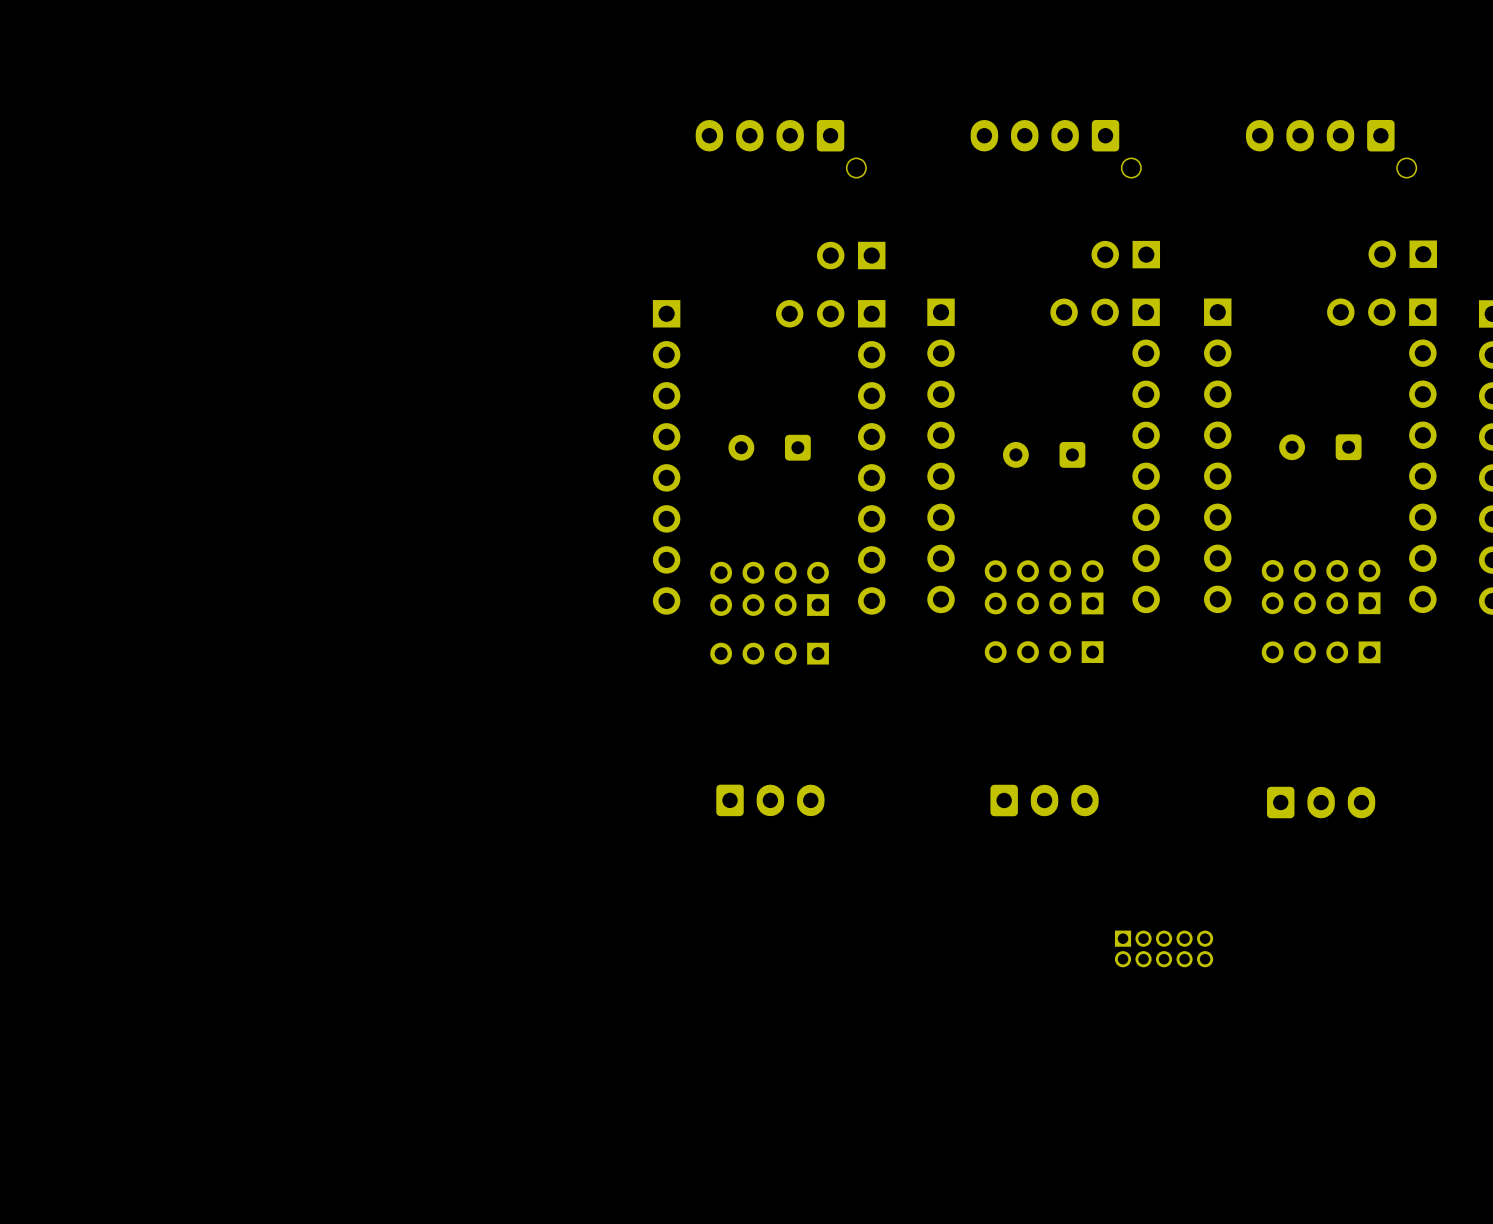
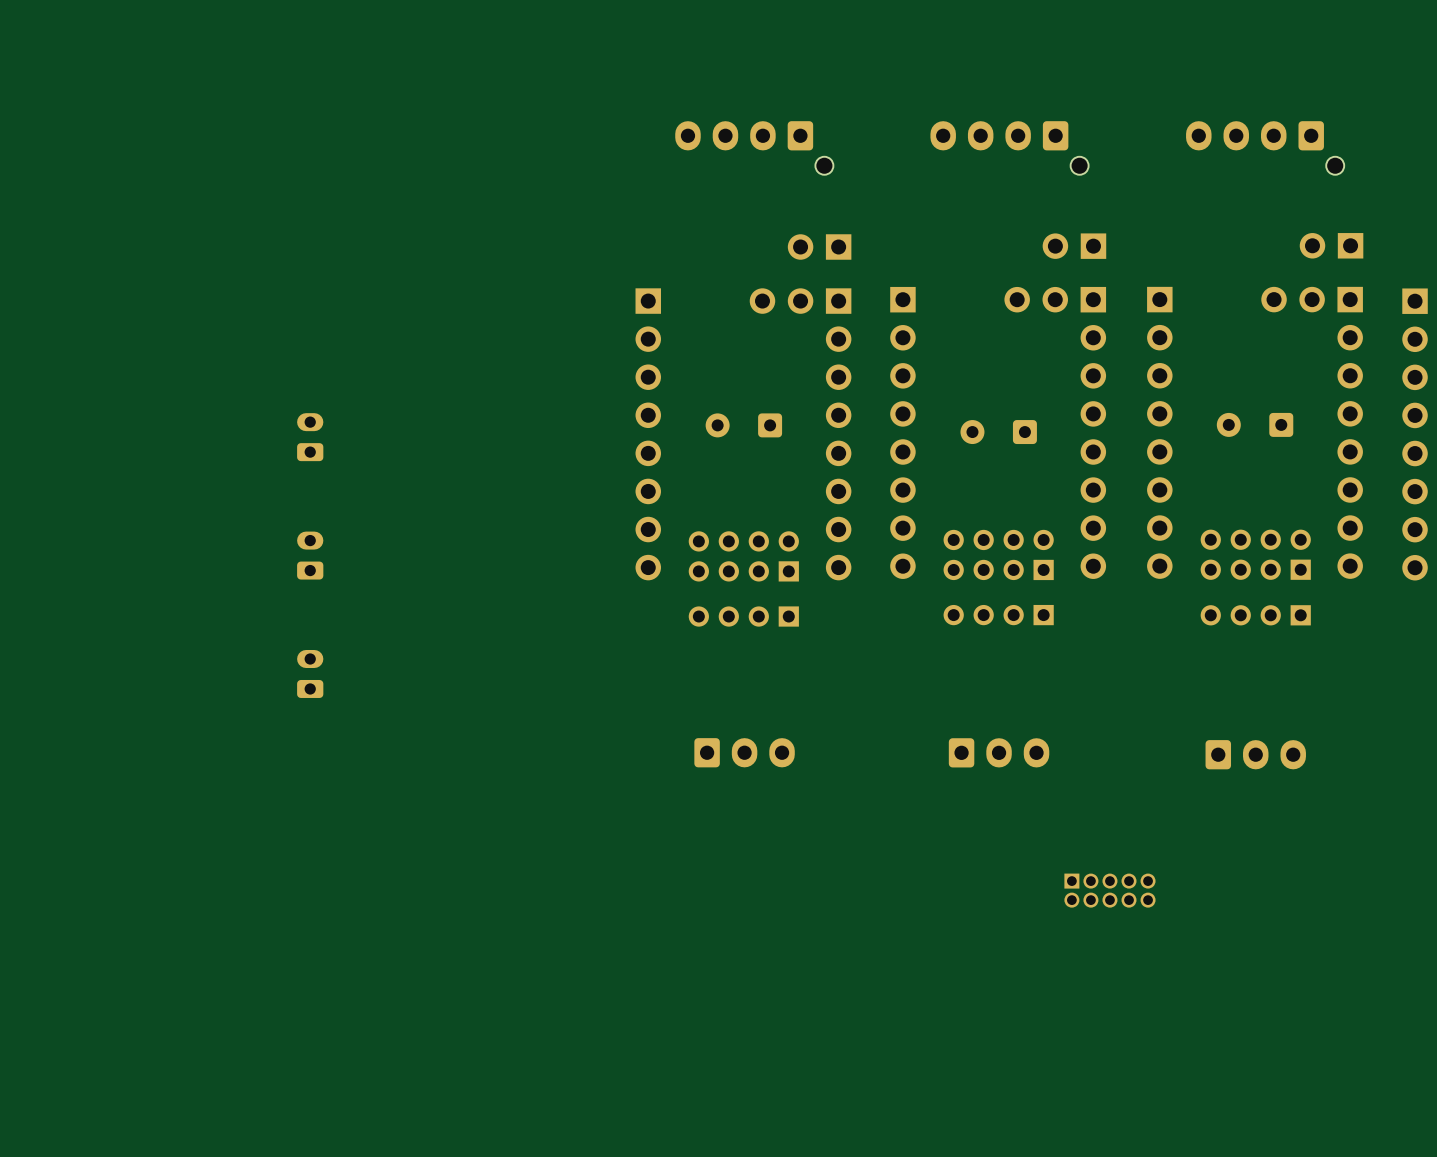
part: none -> (310, 437)
part: none -> (310, 555)
part: none -> (310, 673)

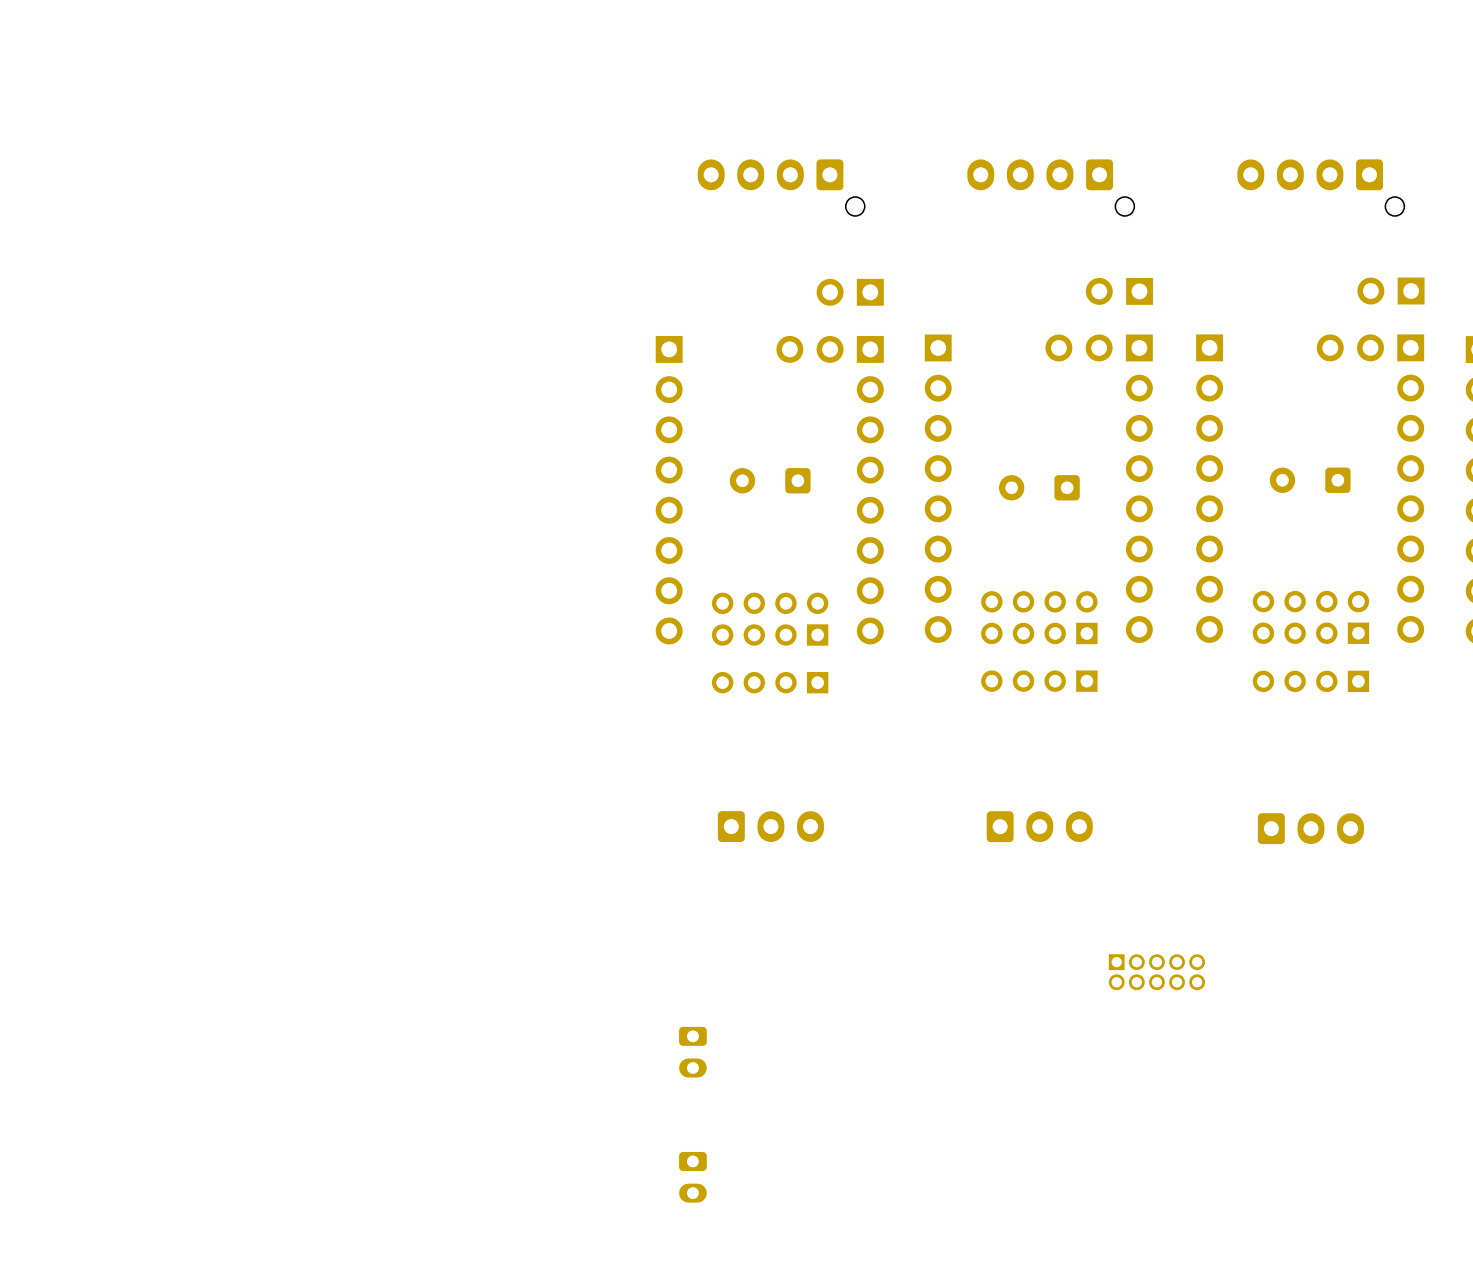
part: (310, 437) -> none
part: (310, 555) -> none
part: (310, 673) -> none
part: none -> (692, 1052)
part: none -> (692, 1177)

